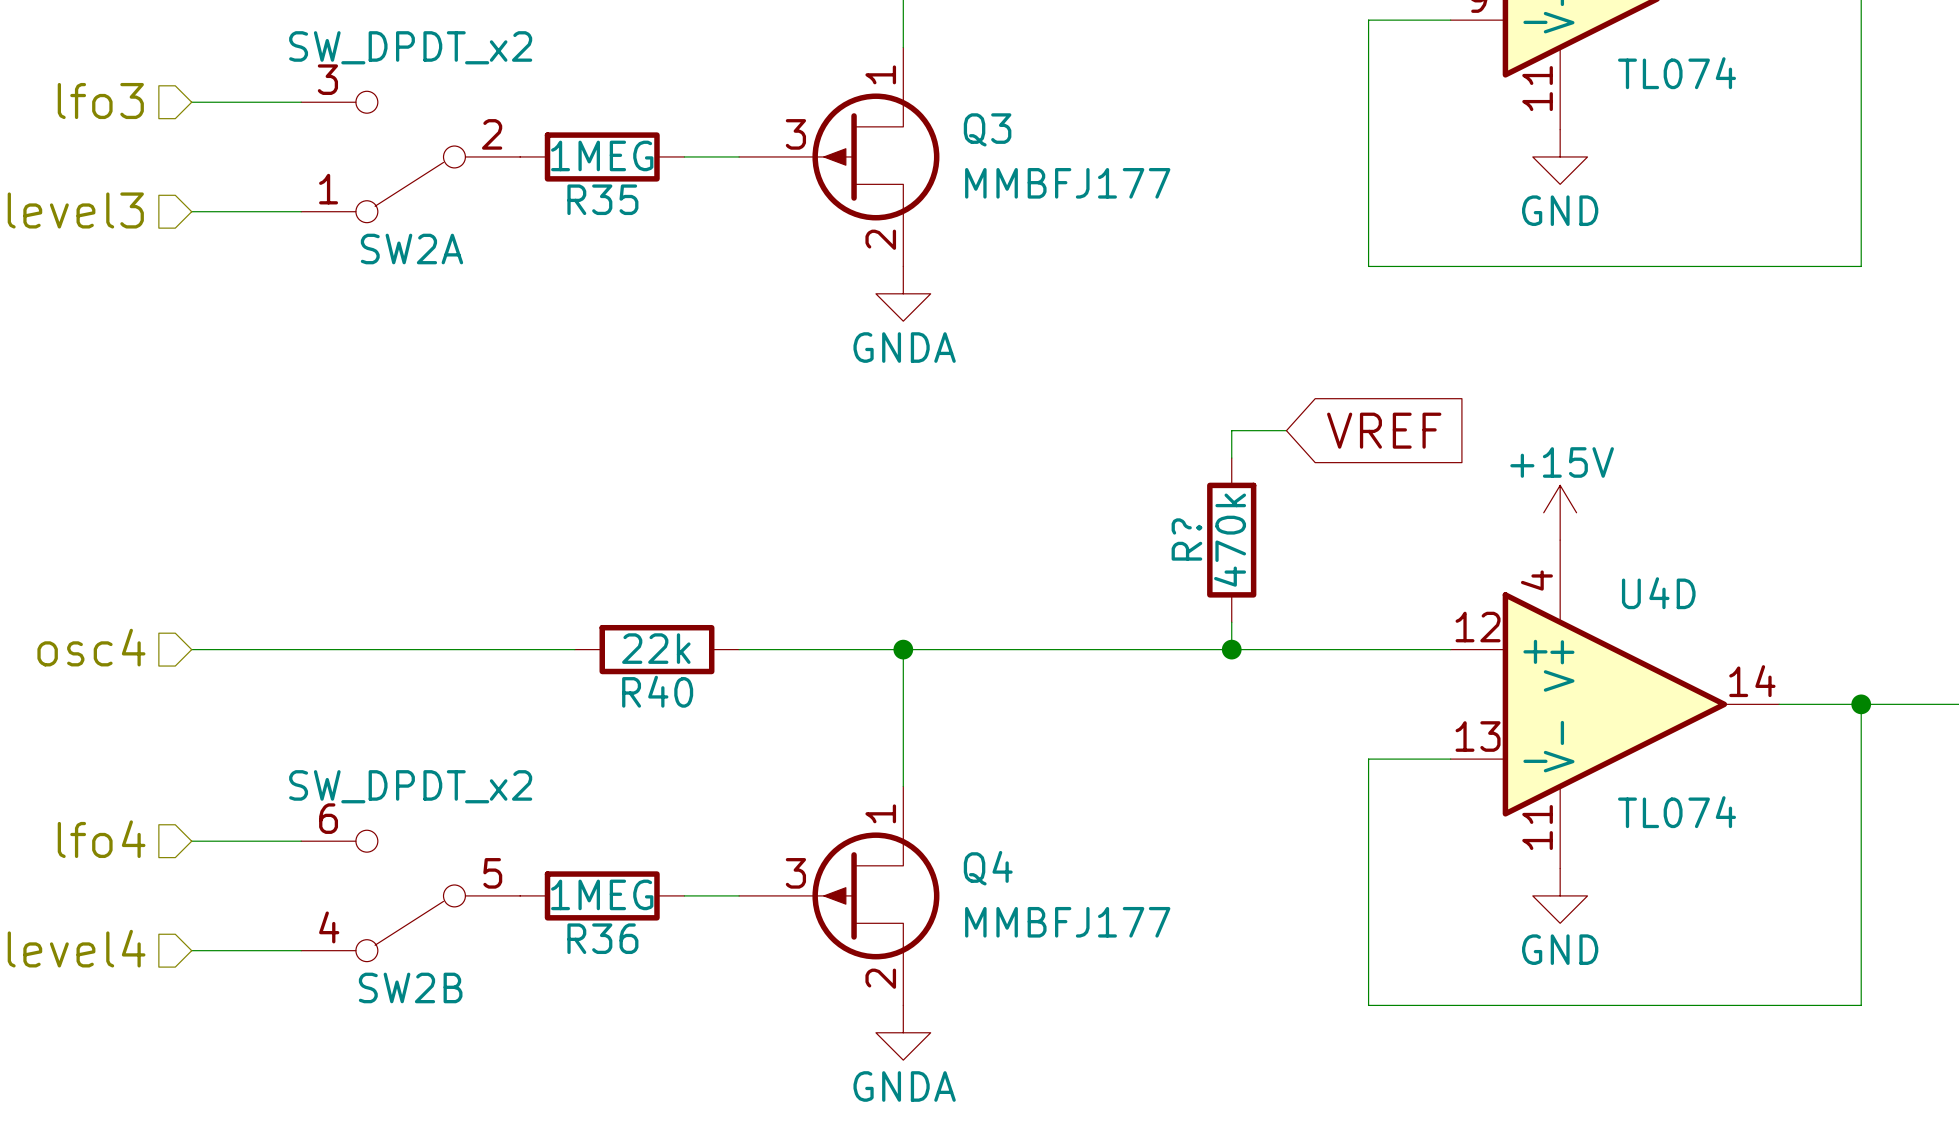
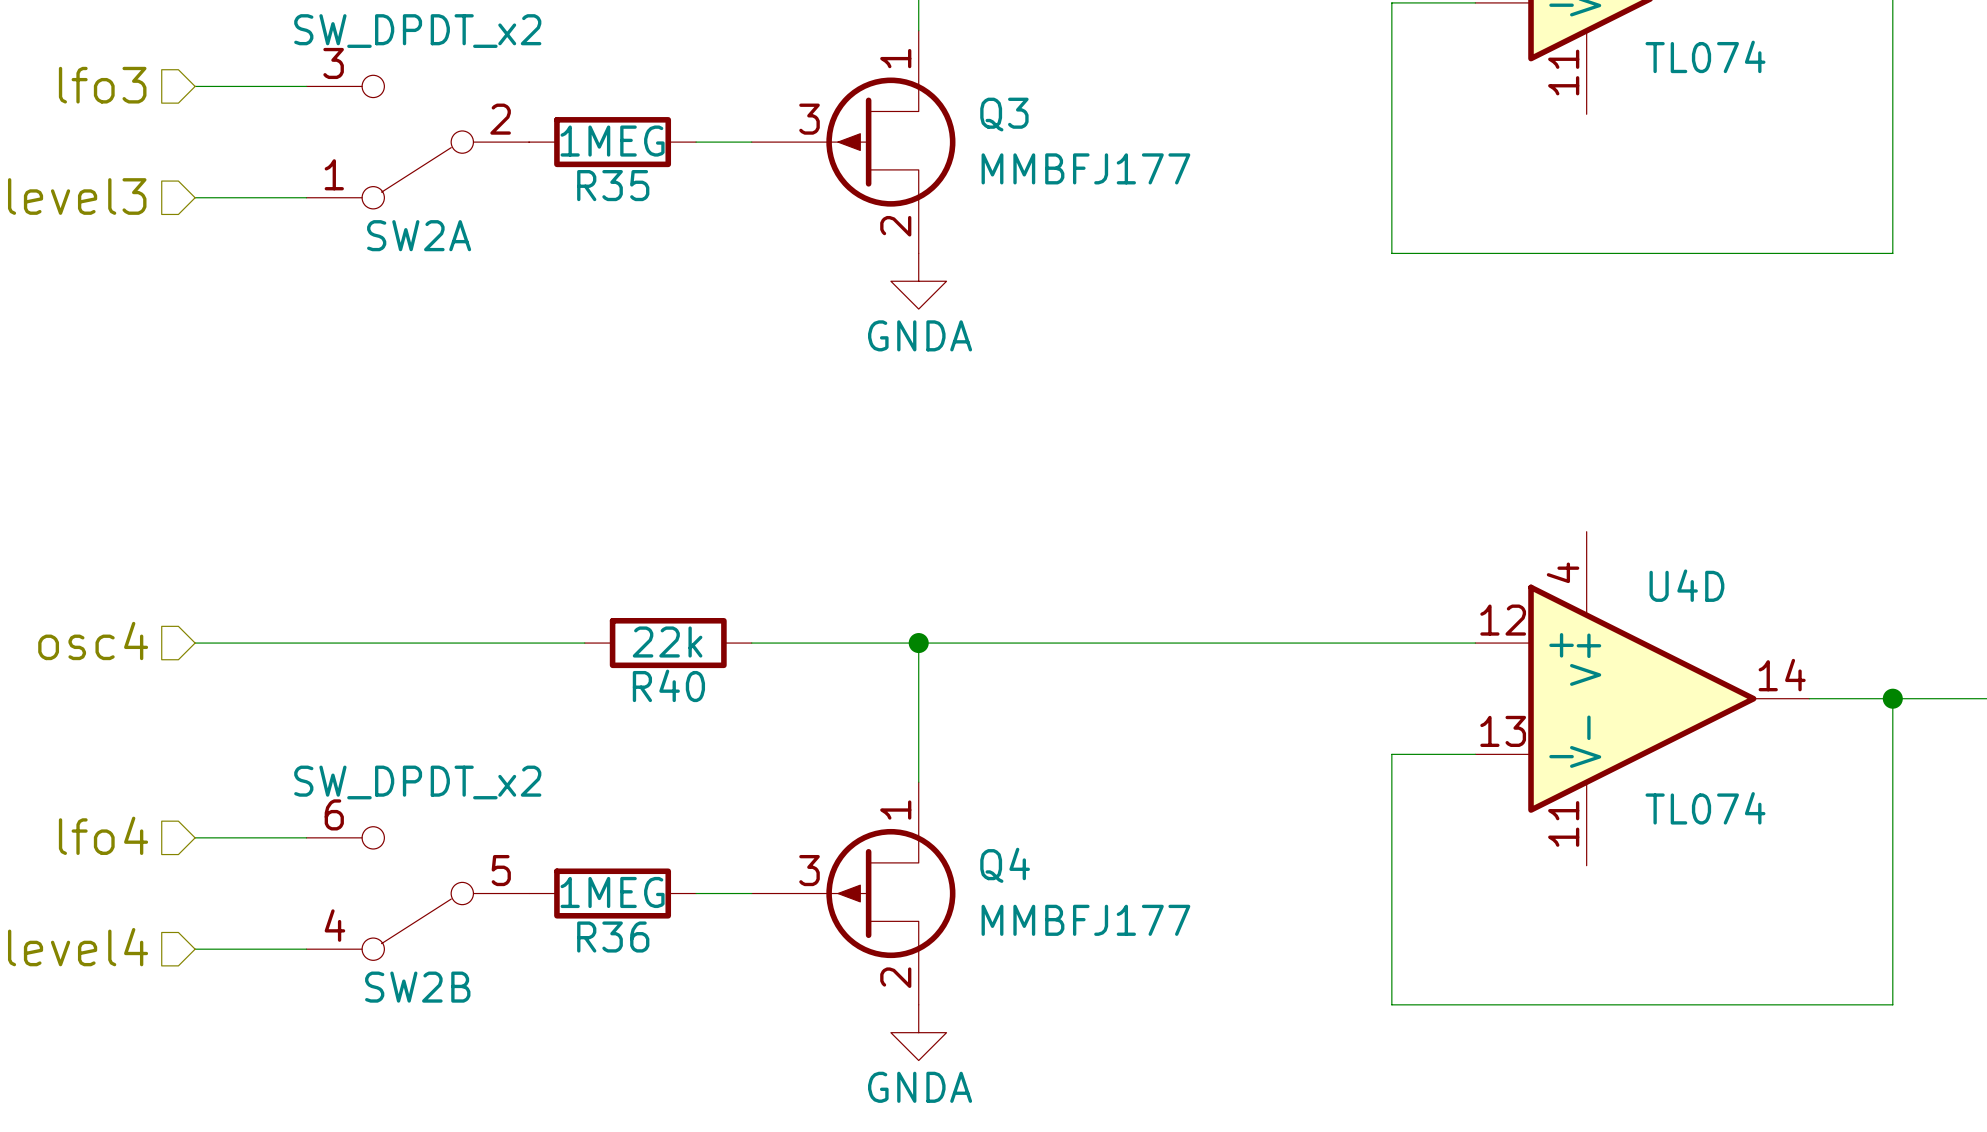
power symbol: GND (1560, 156) -> none
wire: (1286, 430) (1231, 430) (1231, 458) -> none
global label: VREF (1384, 430) -> none
power symbol: +15V (1560, 512) -> none
R?: 470k (1231, 540) -> none
wire: (1231, 622) (1231, 649) -> none
junction: (1231, 649) -> none
power symbol: GND (1560, 895) -> none

